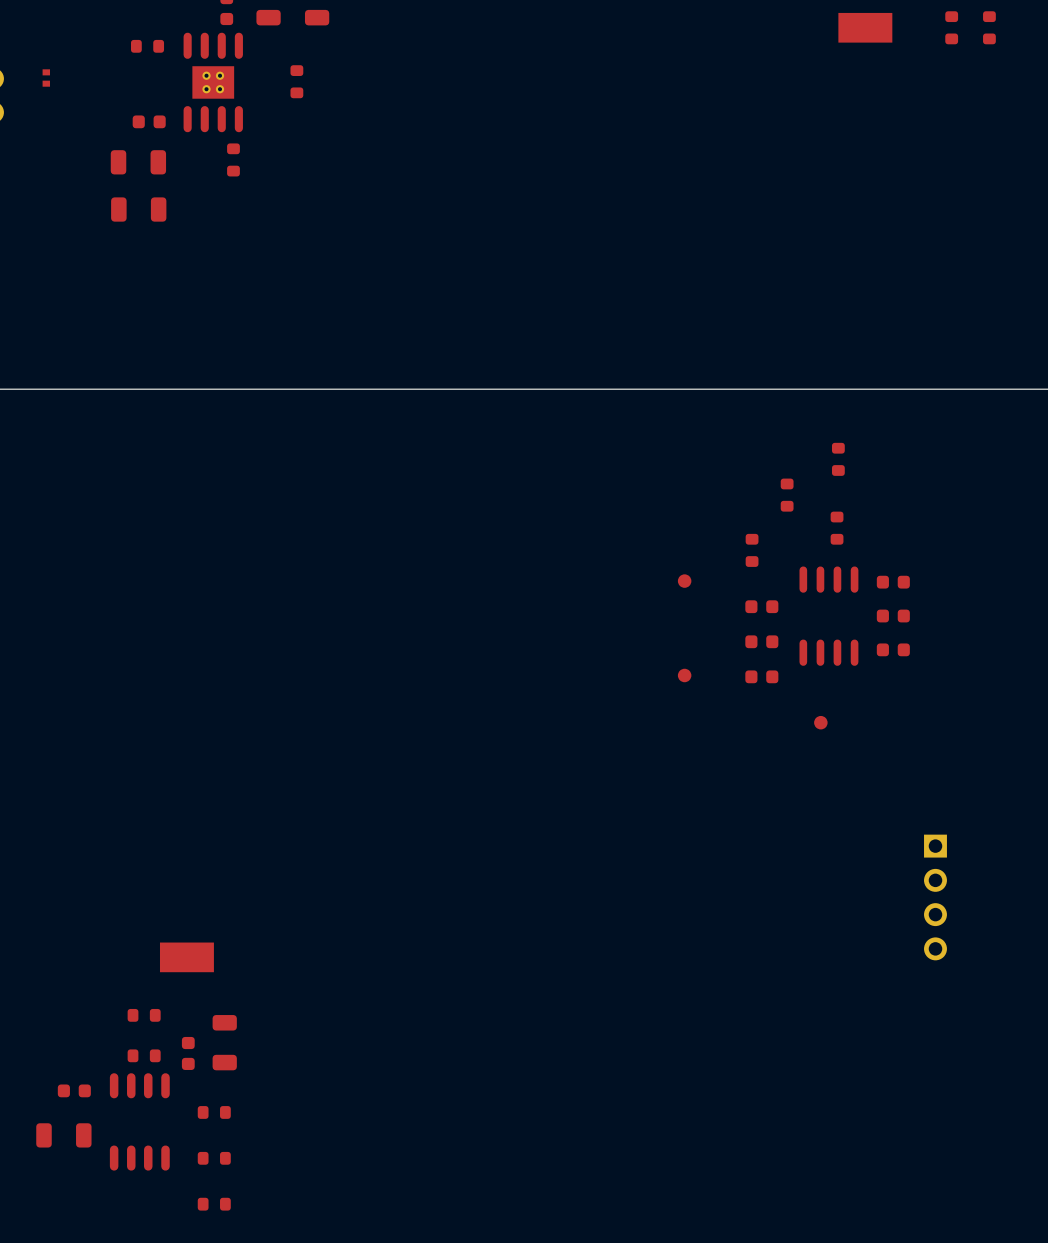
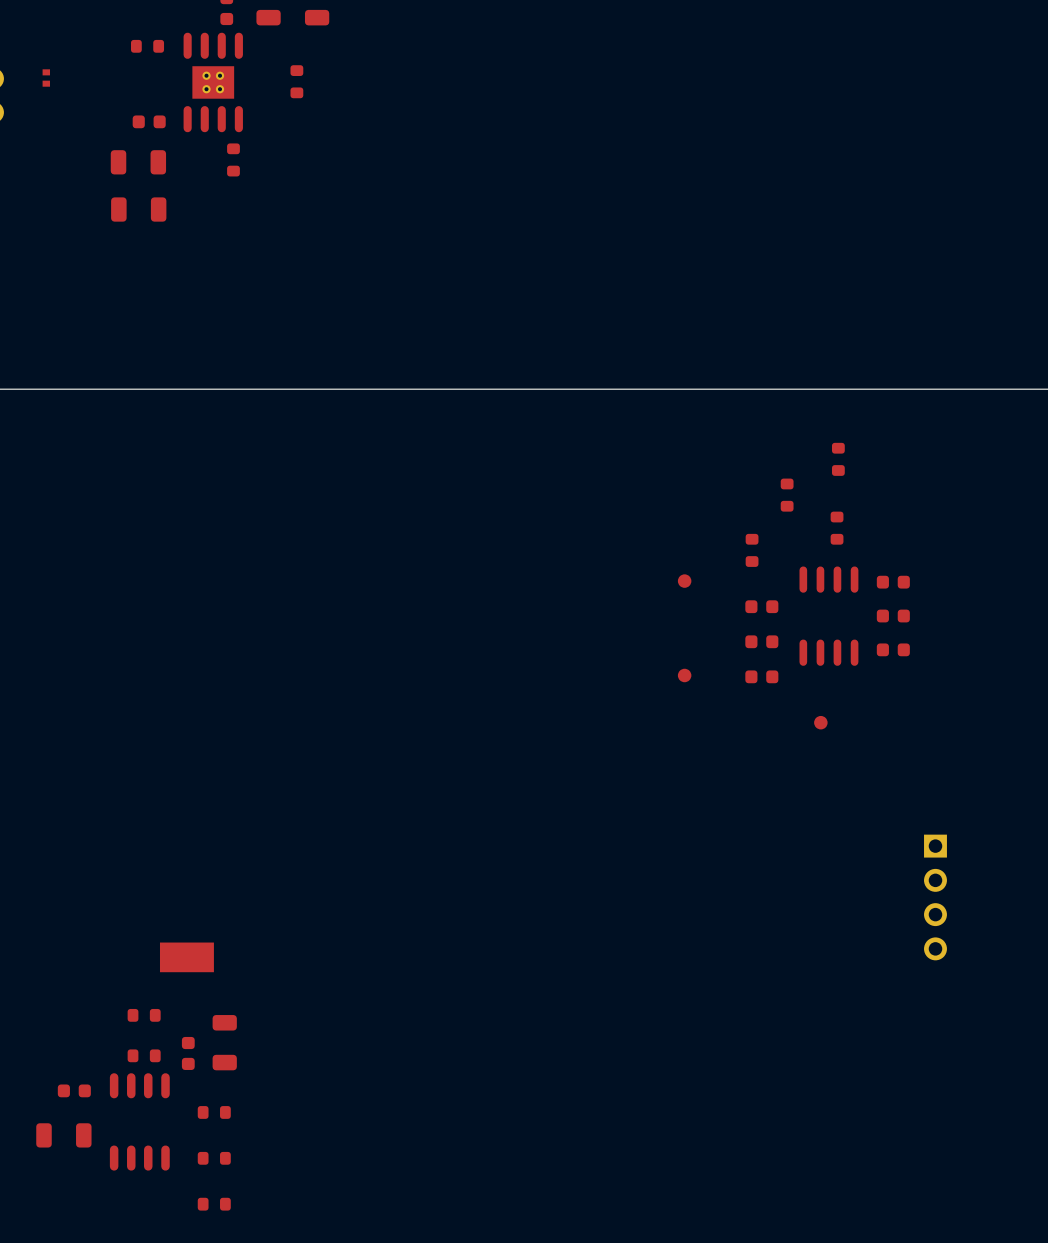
part: (865, 27) -> none
part: (951, 27) -> none
part: (989, 27) -> none

